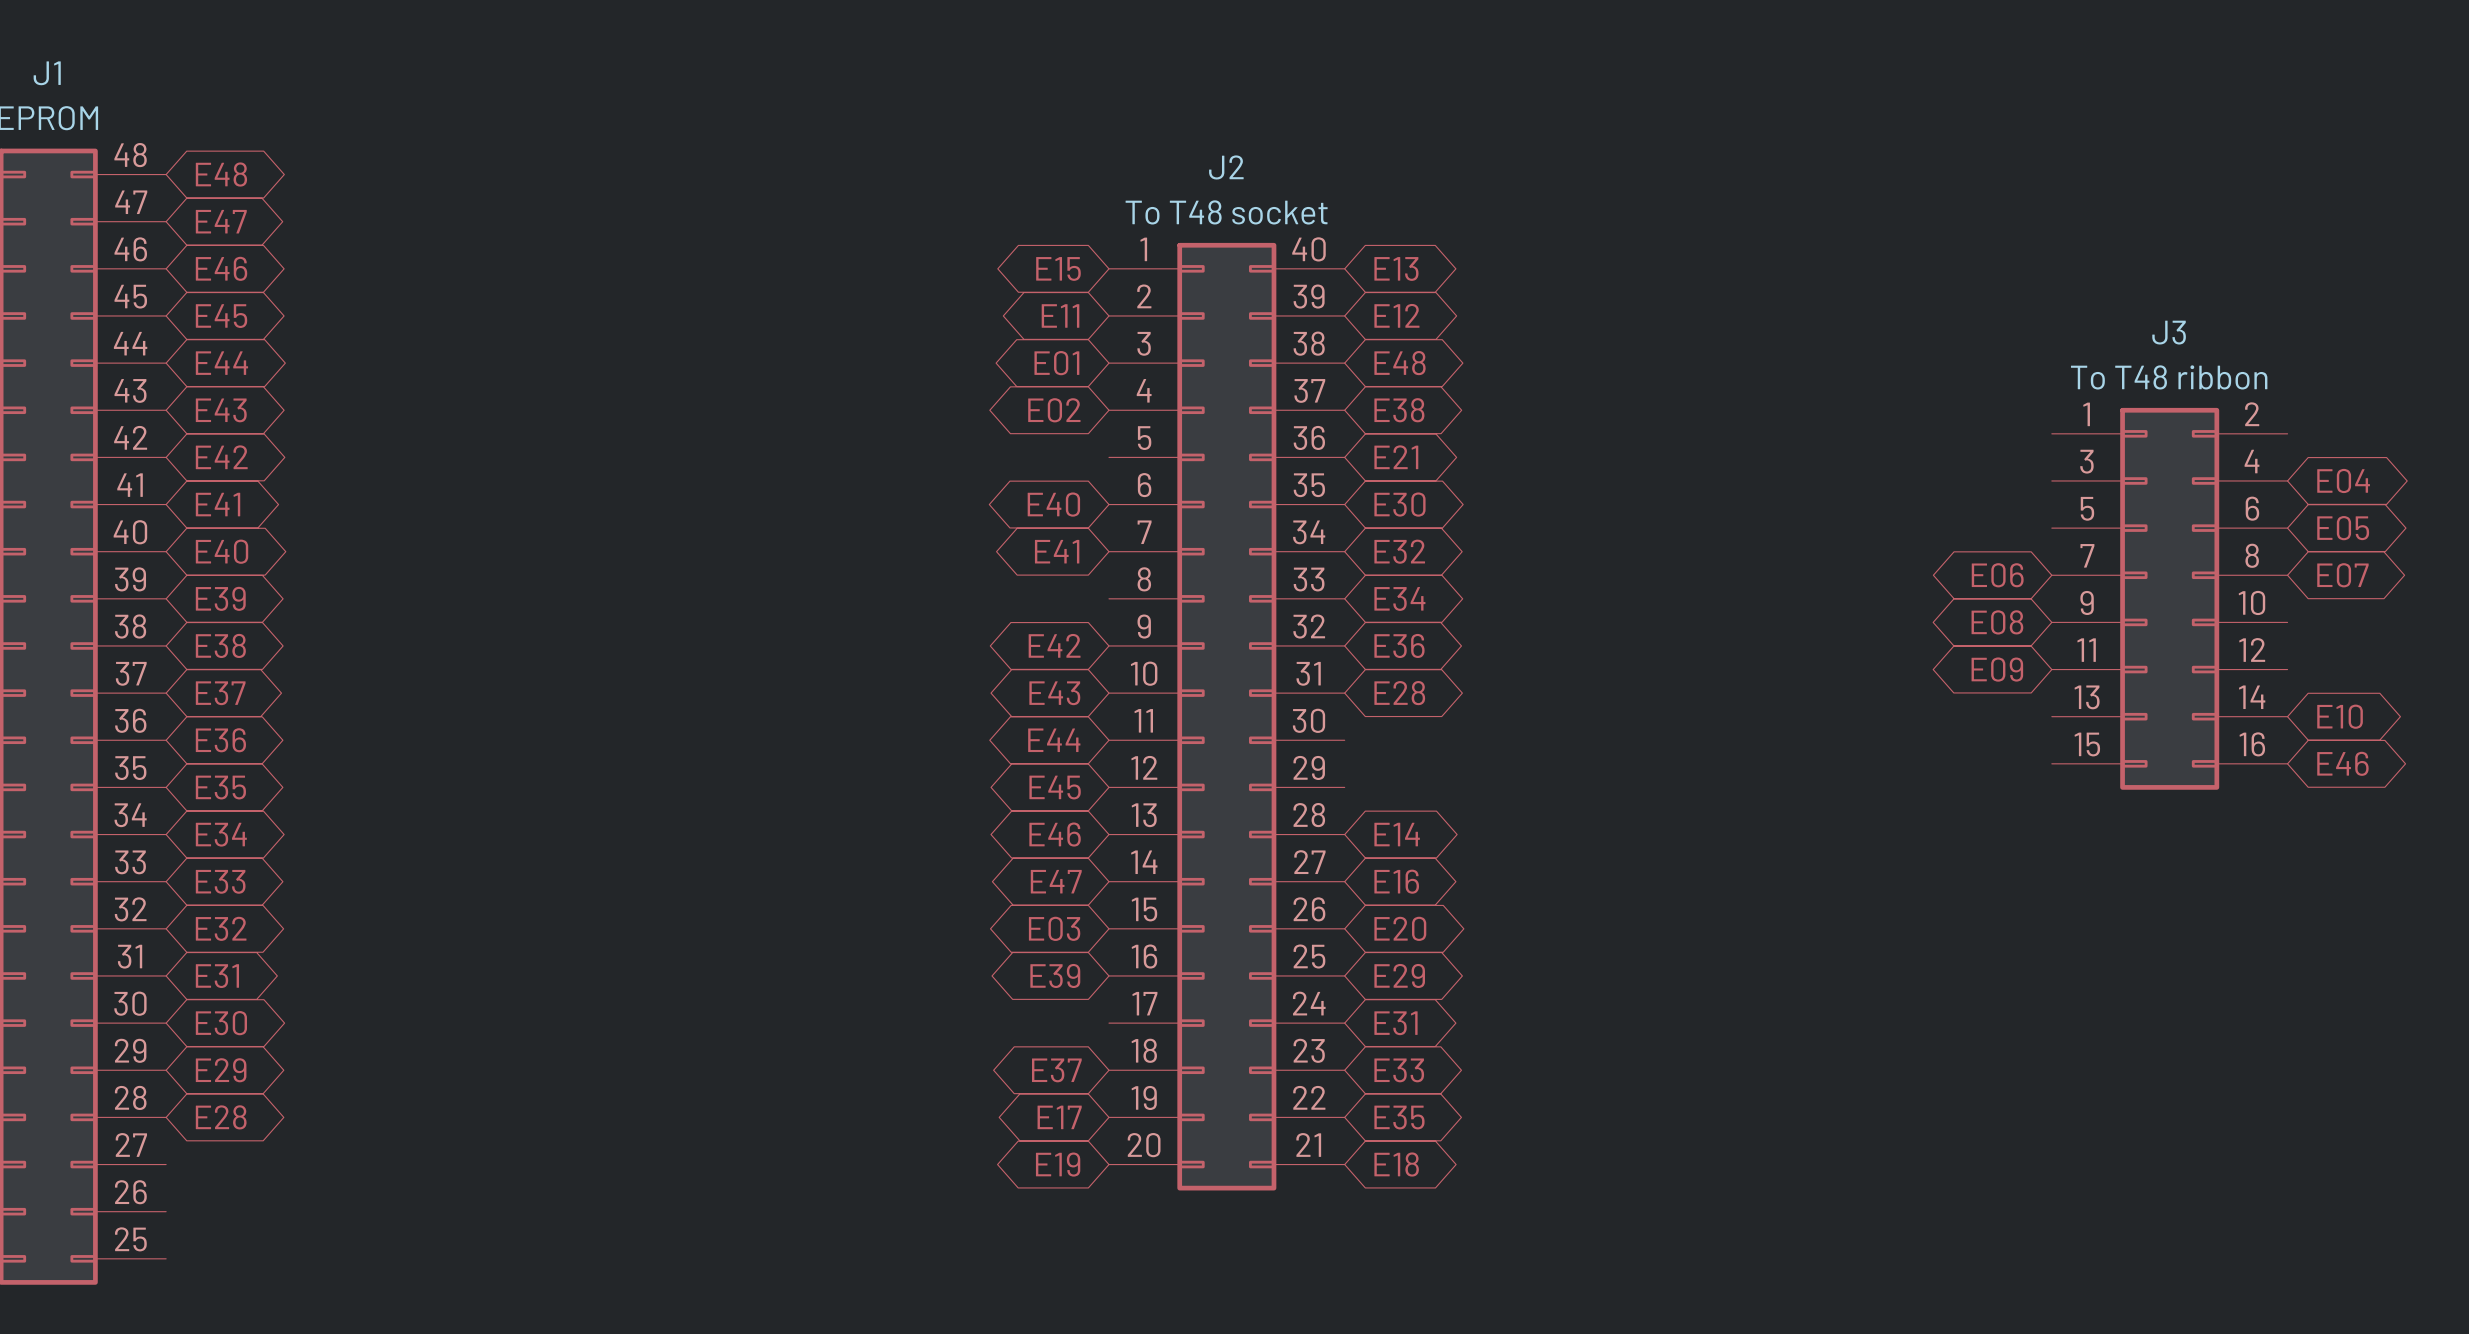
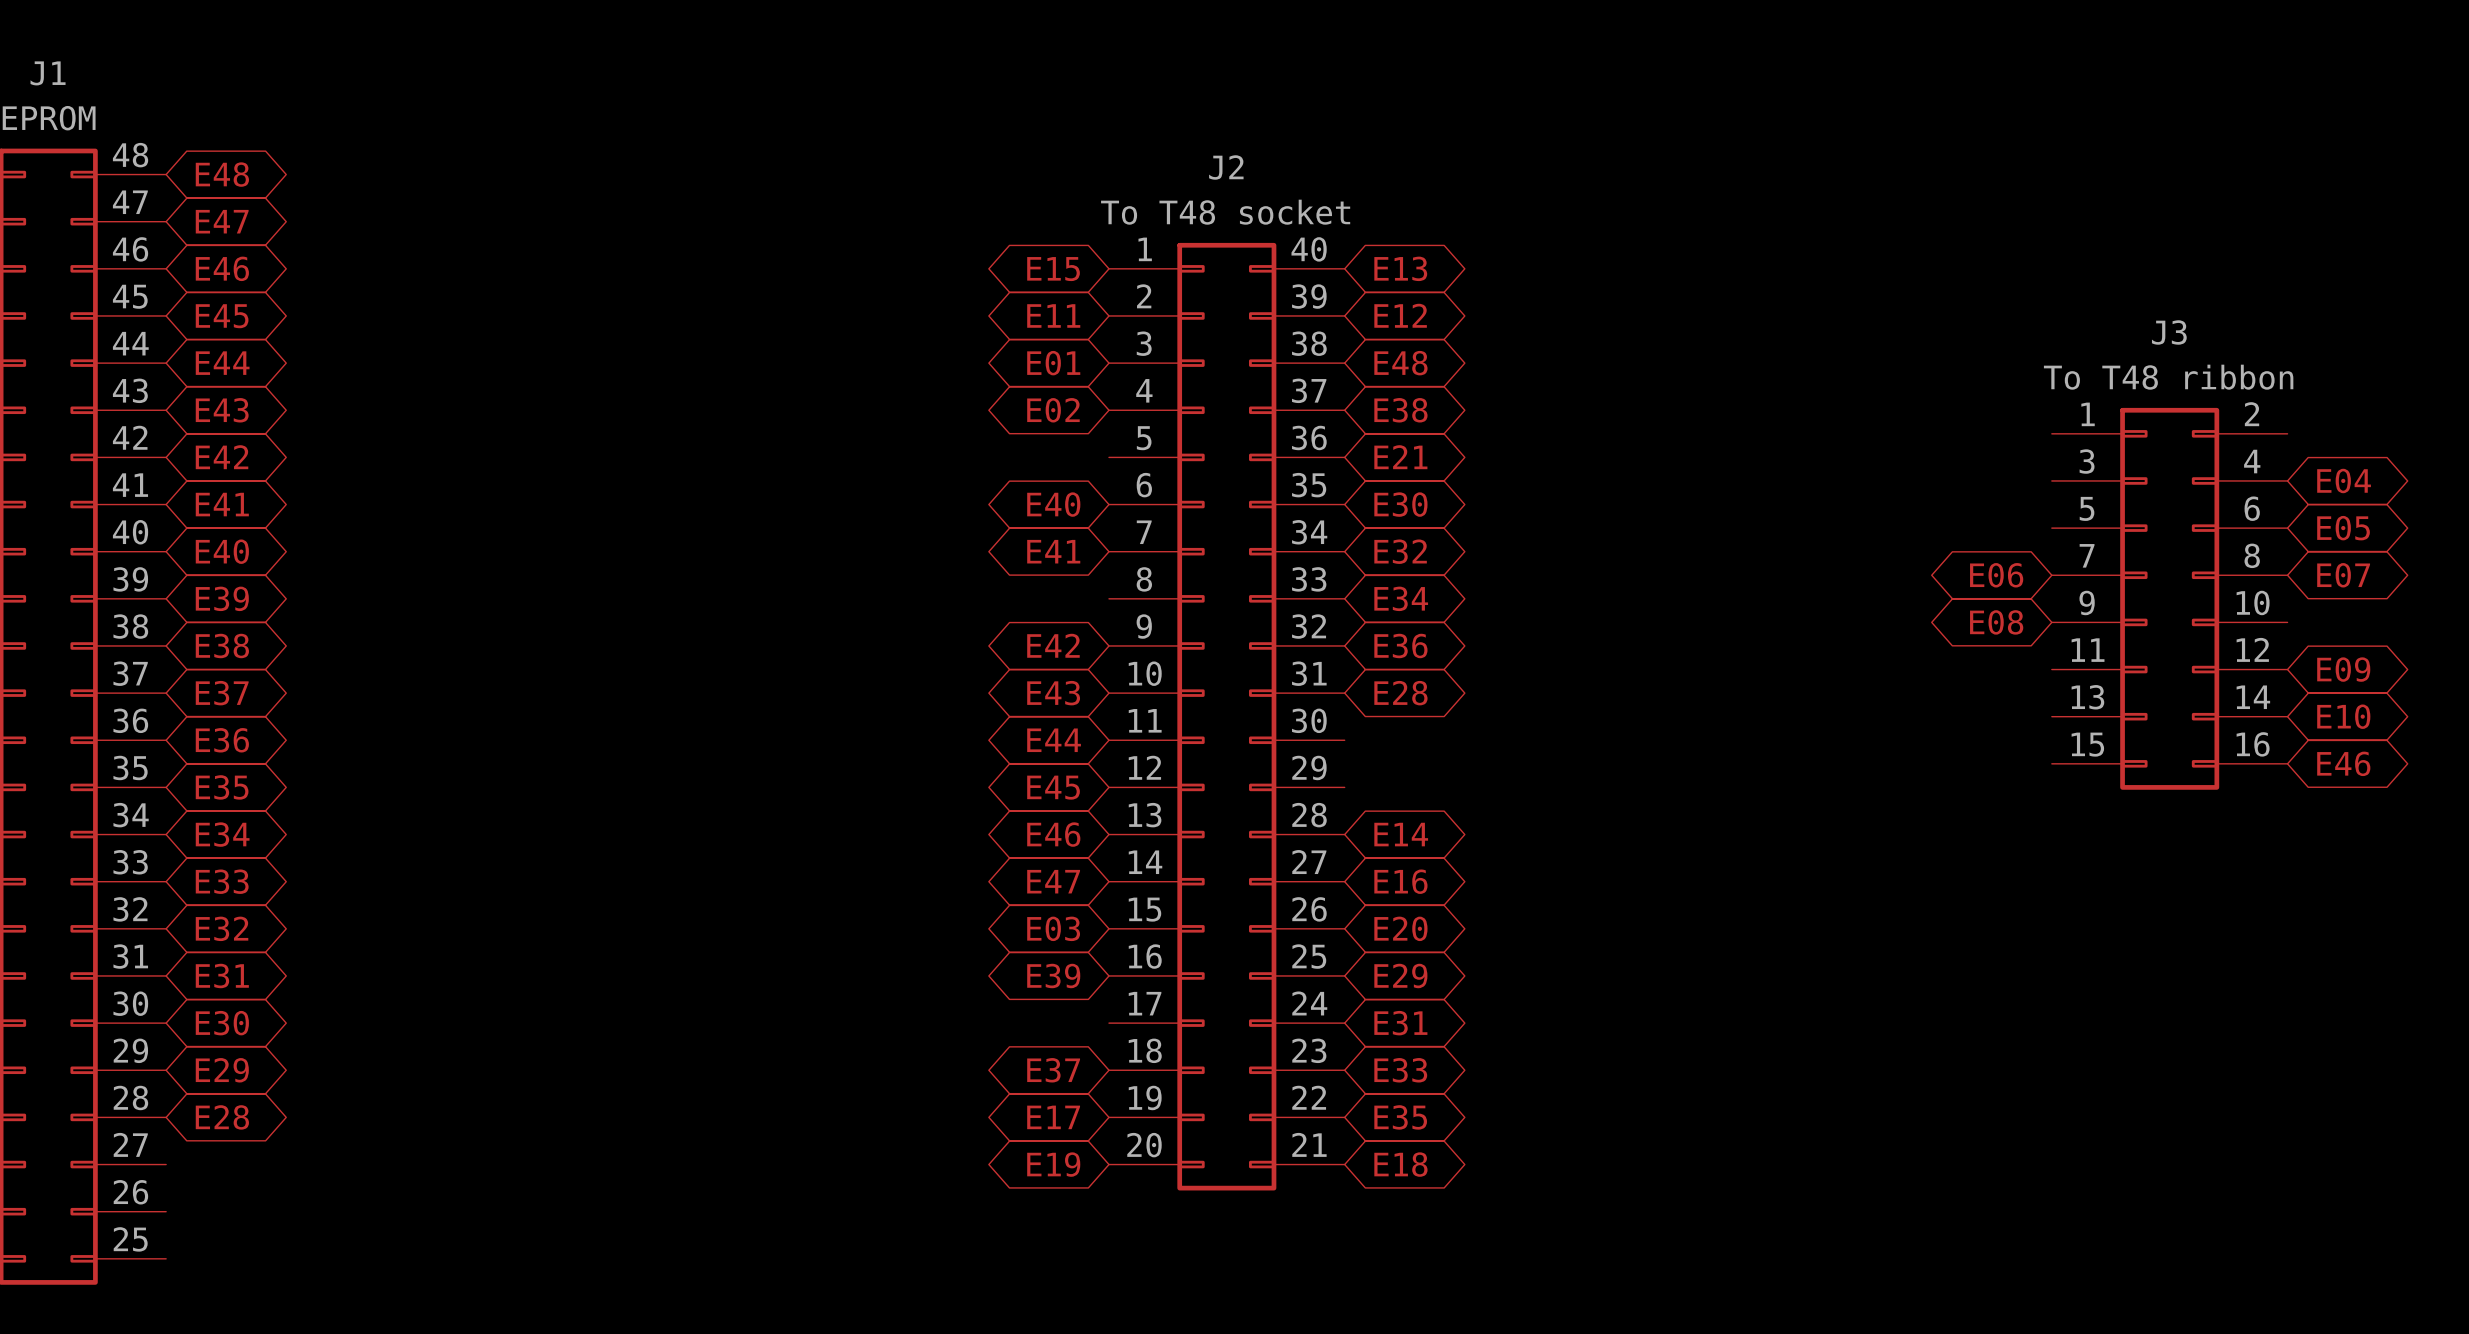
global label rotation: 0° (1997, 669) -> 180° (2343, 669)
global label position: E09 (1997, 669) -> E09 (2343, 669)

